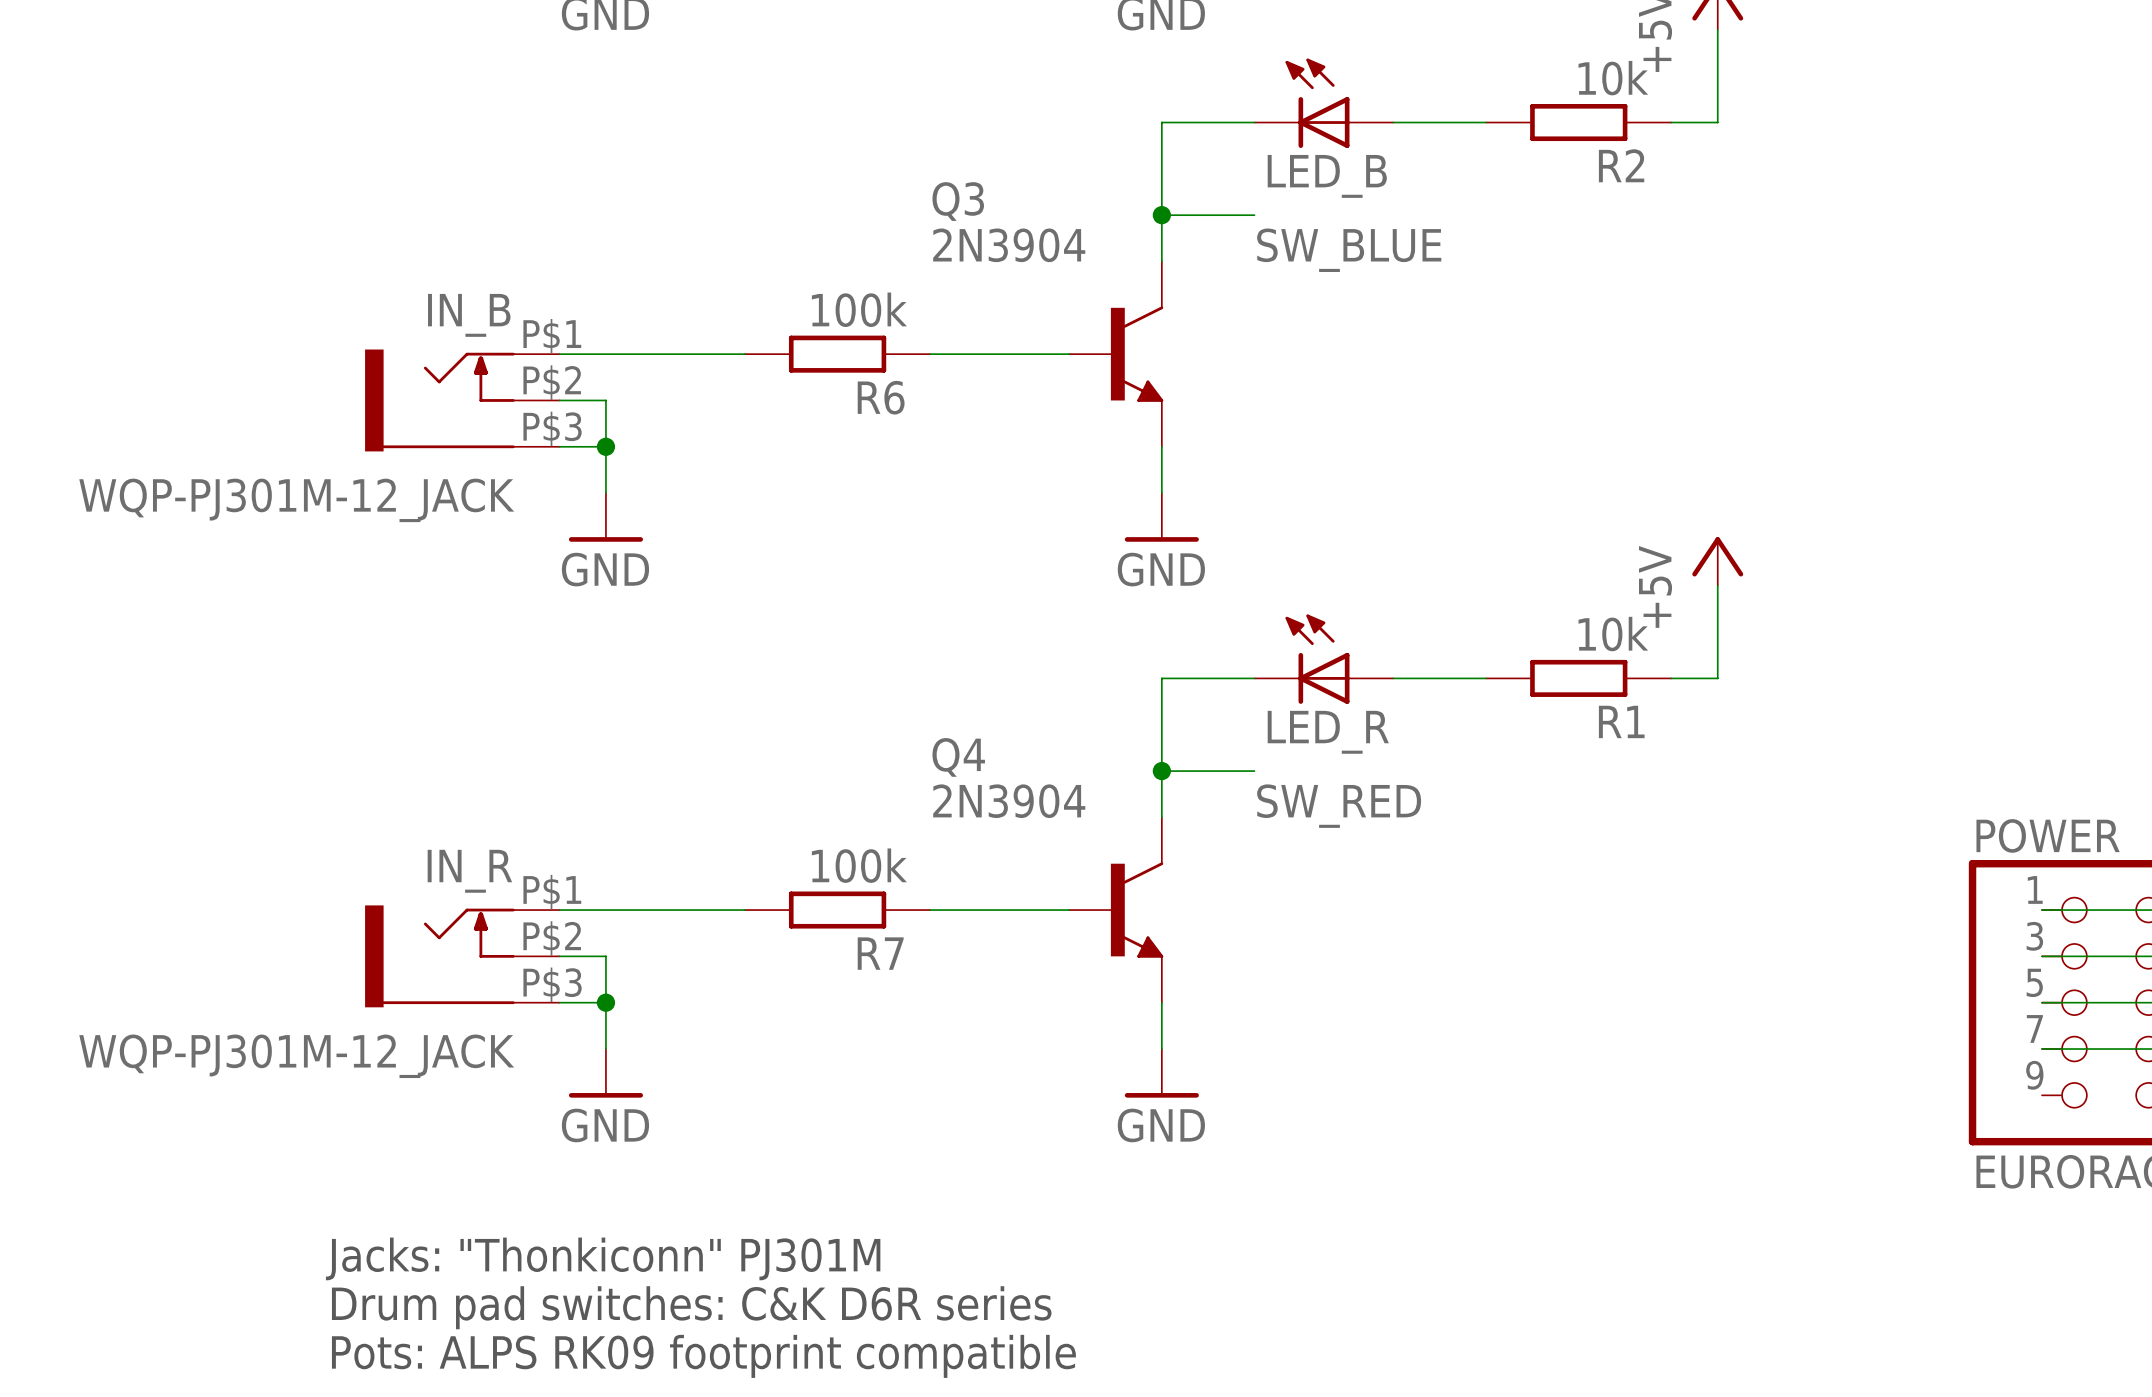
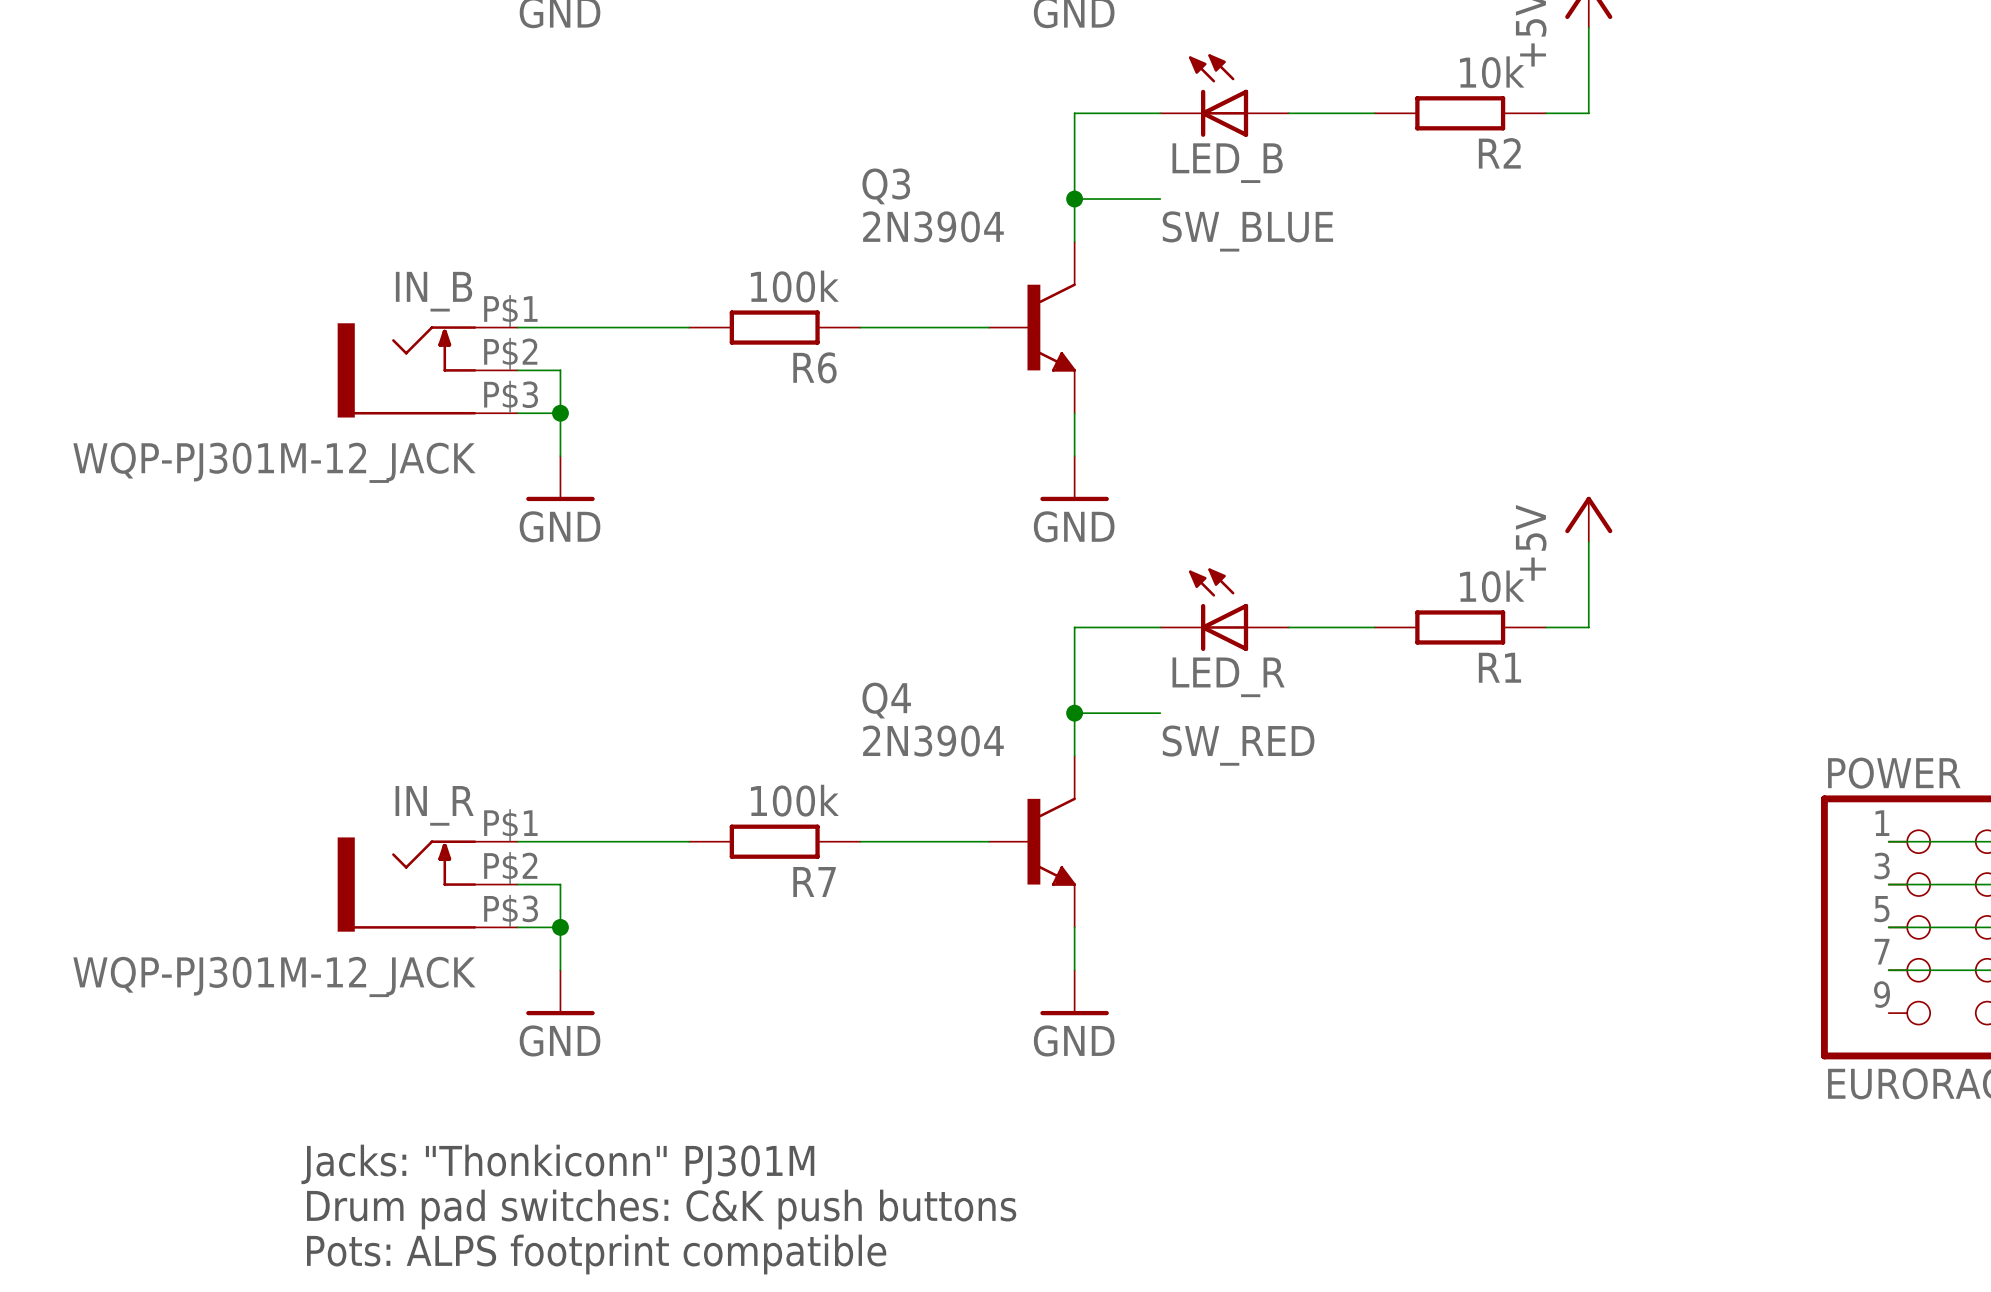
text: Drum pad switches: C&K D6R series (691, 1307) -> Drum pad switches: C&K push buttons (661, 1209)
text: Pots: ALPS RK09 footprint compatible (703, 1356) -> Pots: ALPS footprint compatible (596, 1254)

